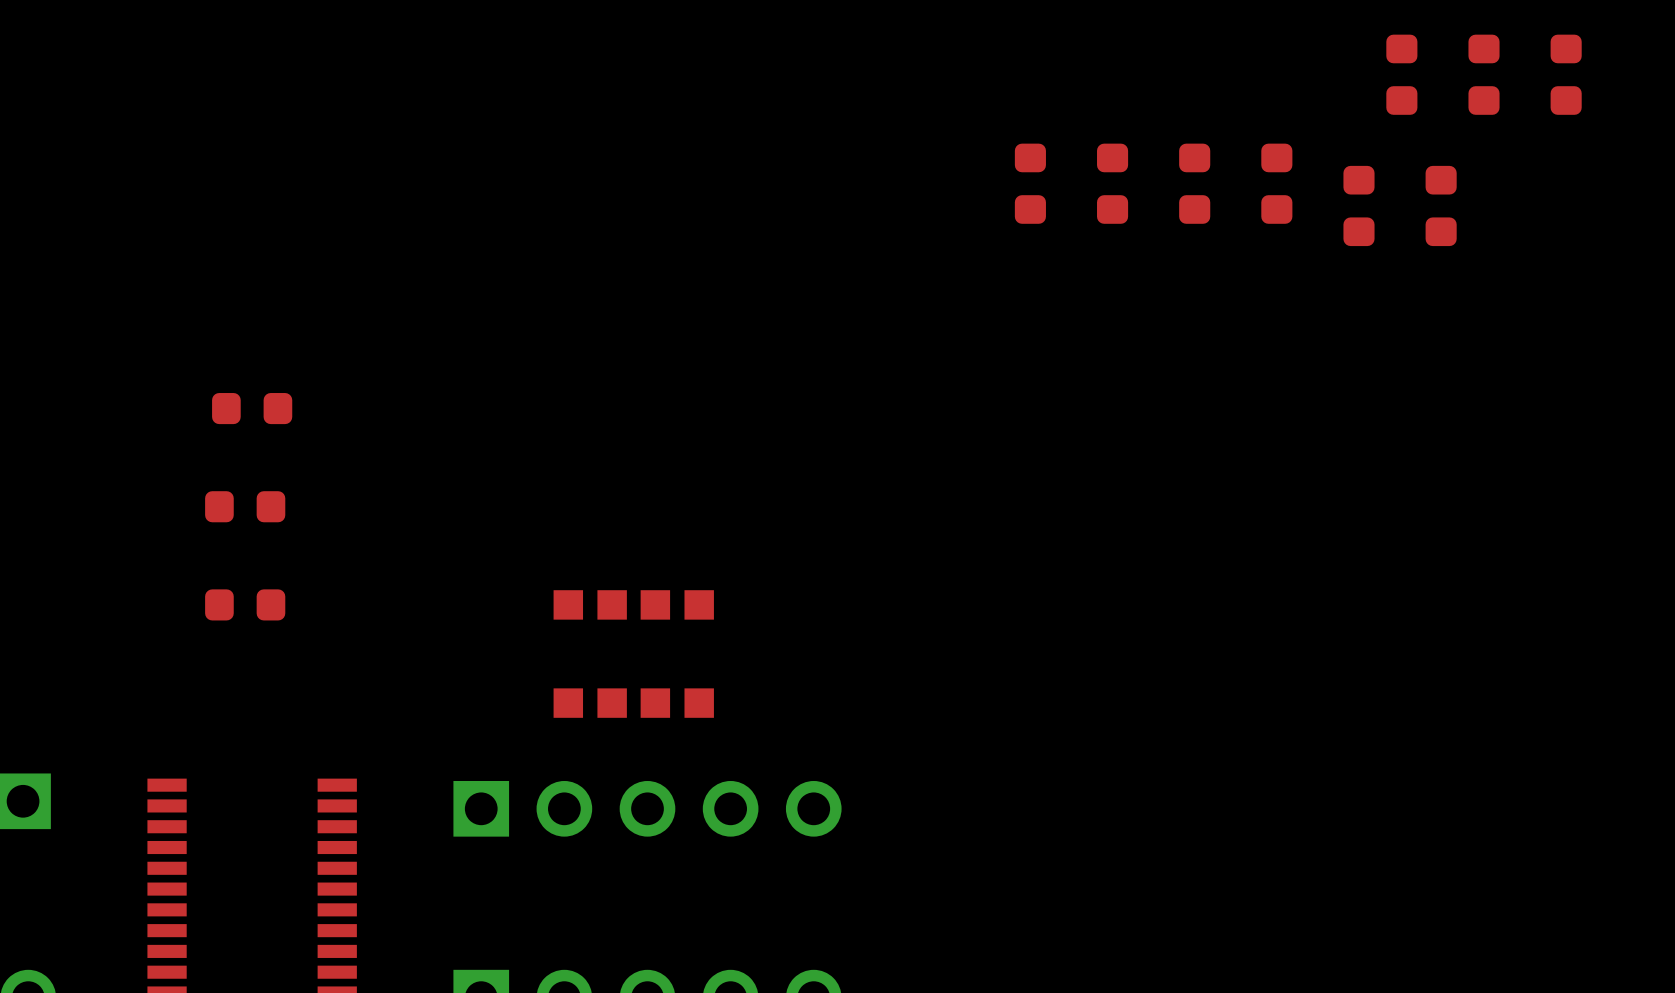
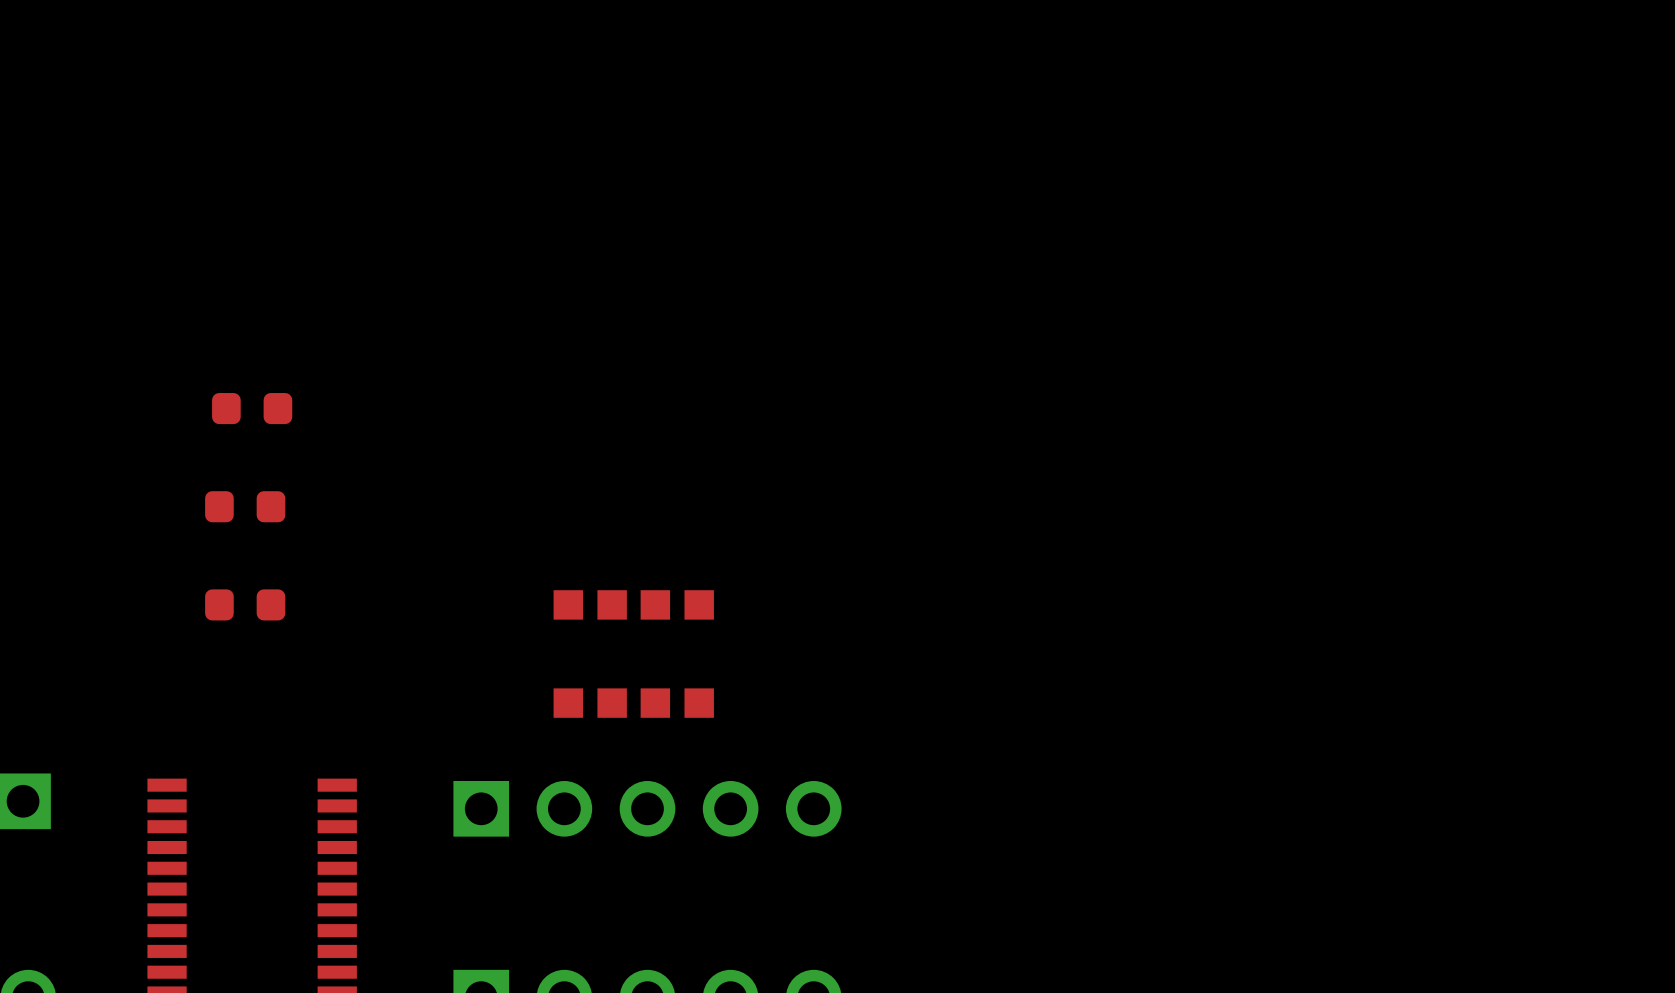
part: (1401, 74) -> none
part: (1484, 74) -> none
part: (1566, 74) -> none
part: (1030, 183) -> none
part: (1112, 183) -> none
part: (1194, 183) -> none
part: (1276, 183) -> none
part: (1358, 205) -> none
part: (1441, 205) -> none

